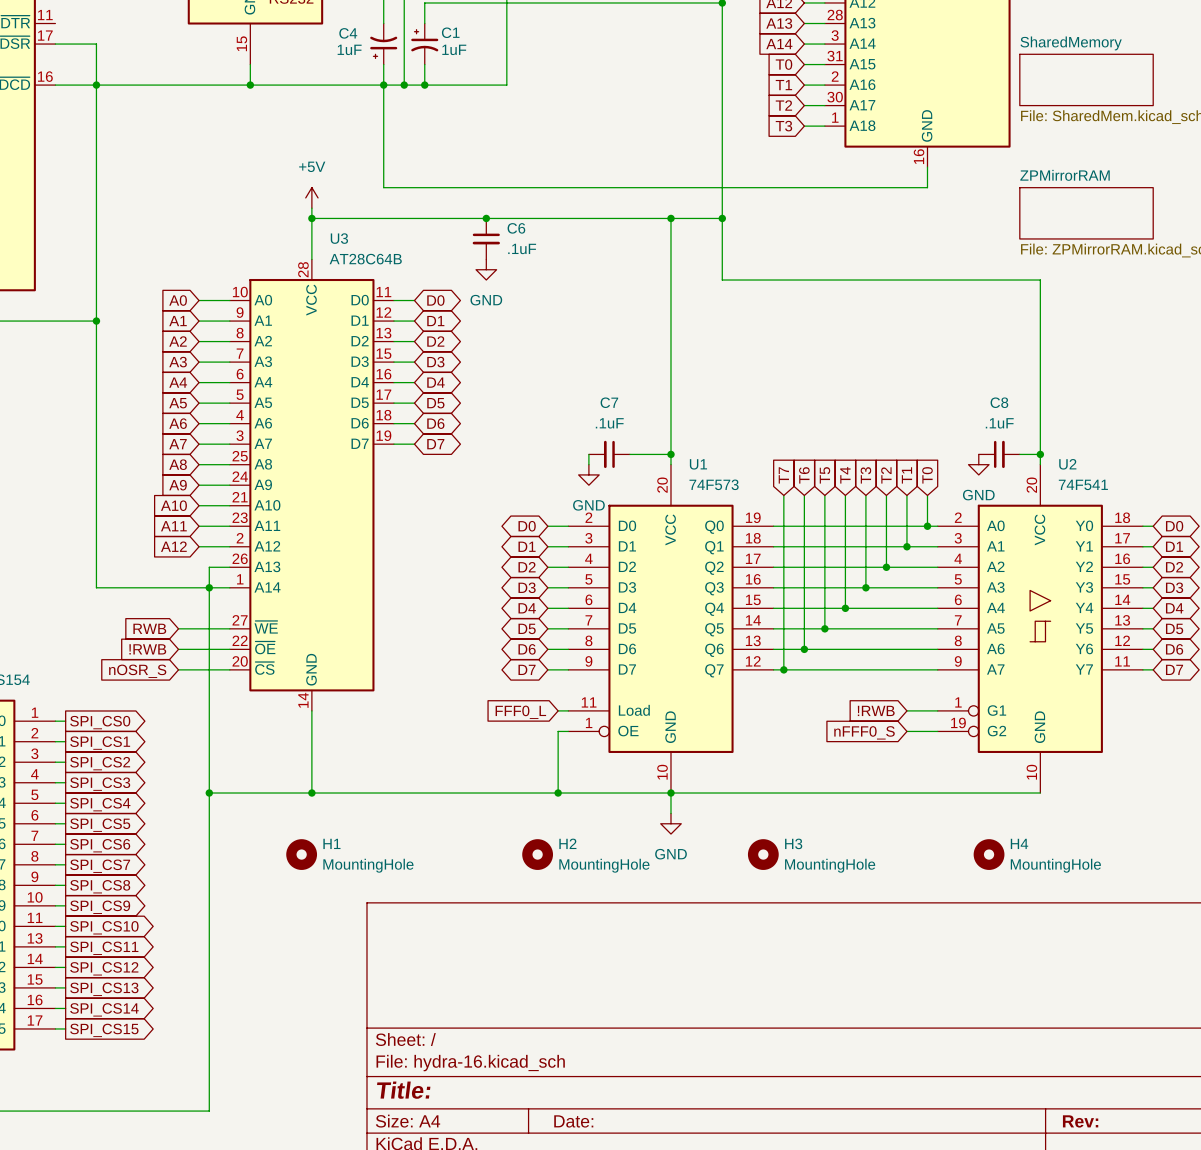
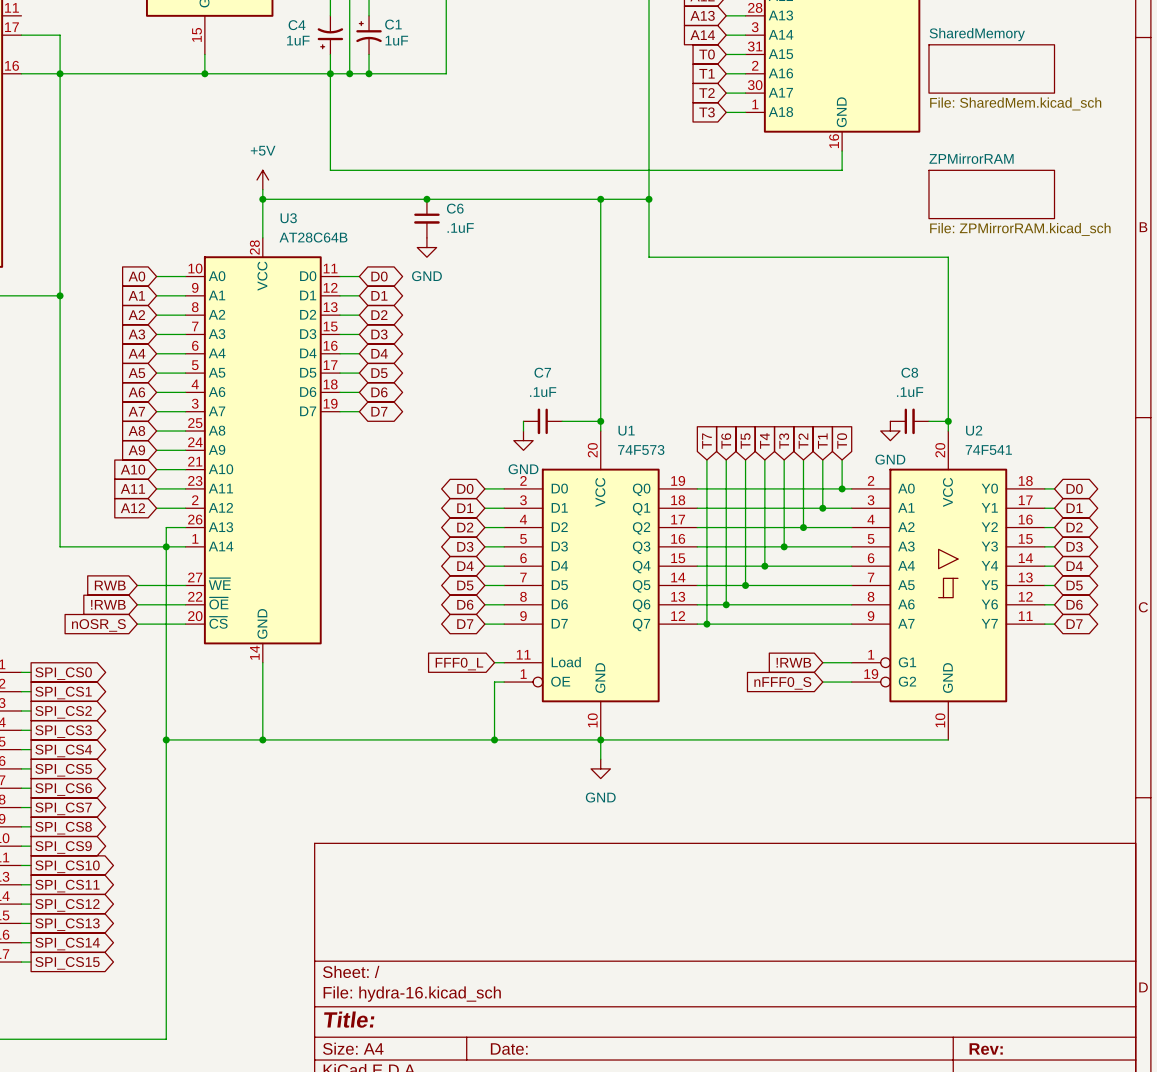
H1: MountingHole (301, 854) -> none
H2: MountingHole (537, 854) -> none
H3: MountingHole (763, 854) -> none
H4: MountingHole (989, 854) -> none

